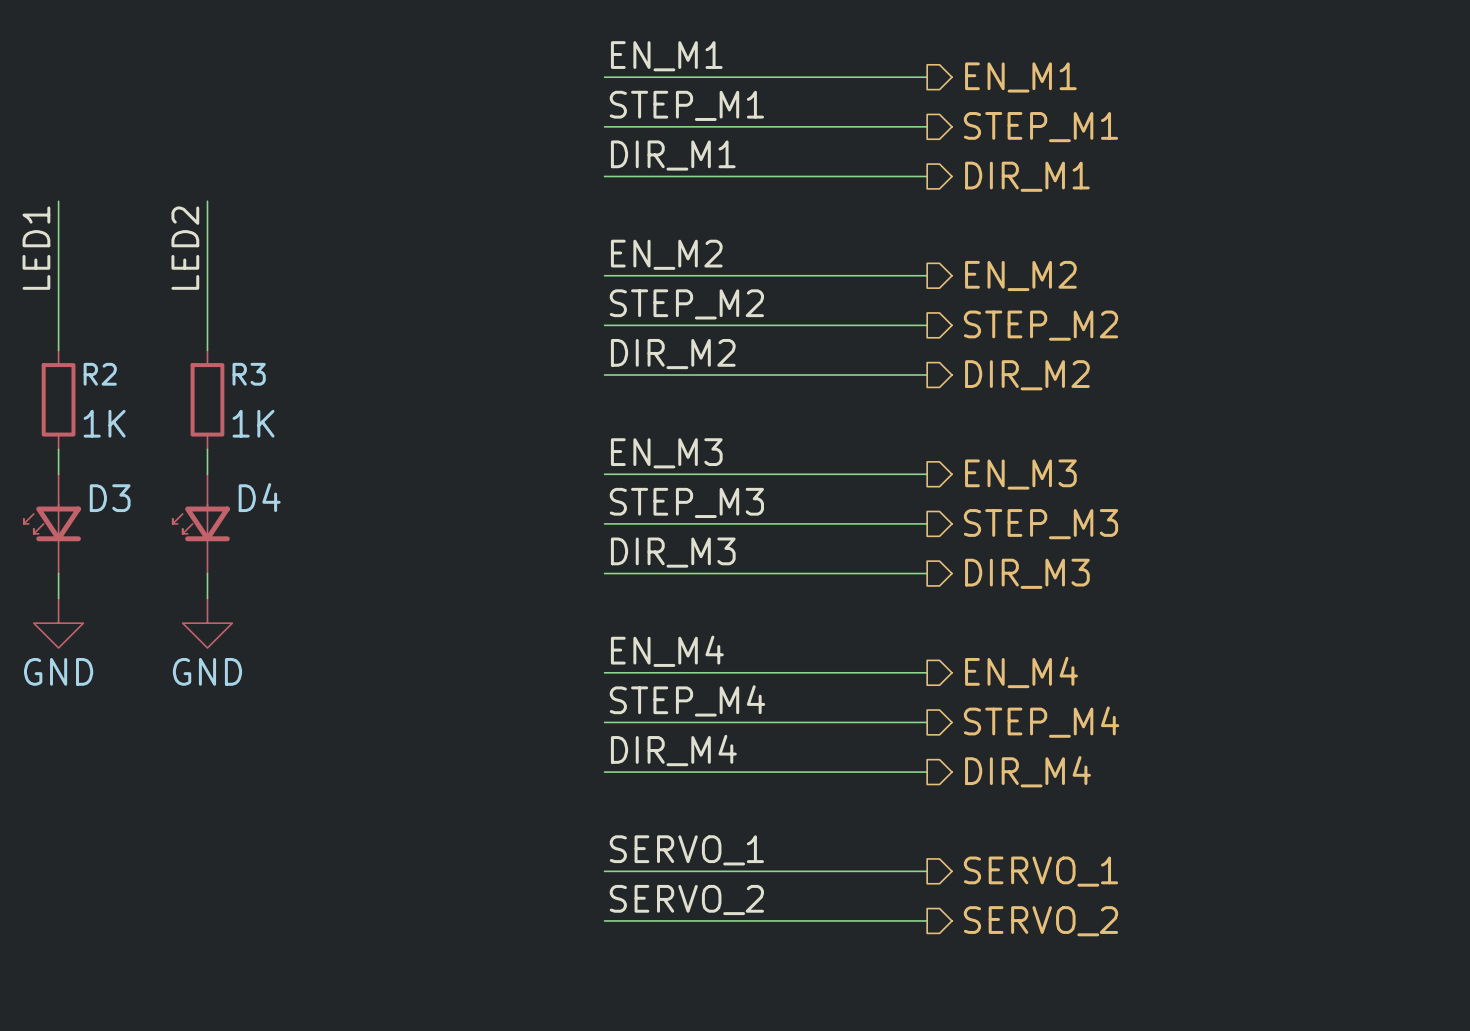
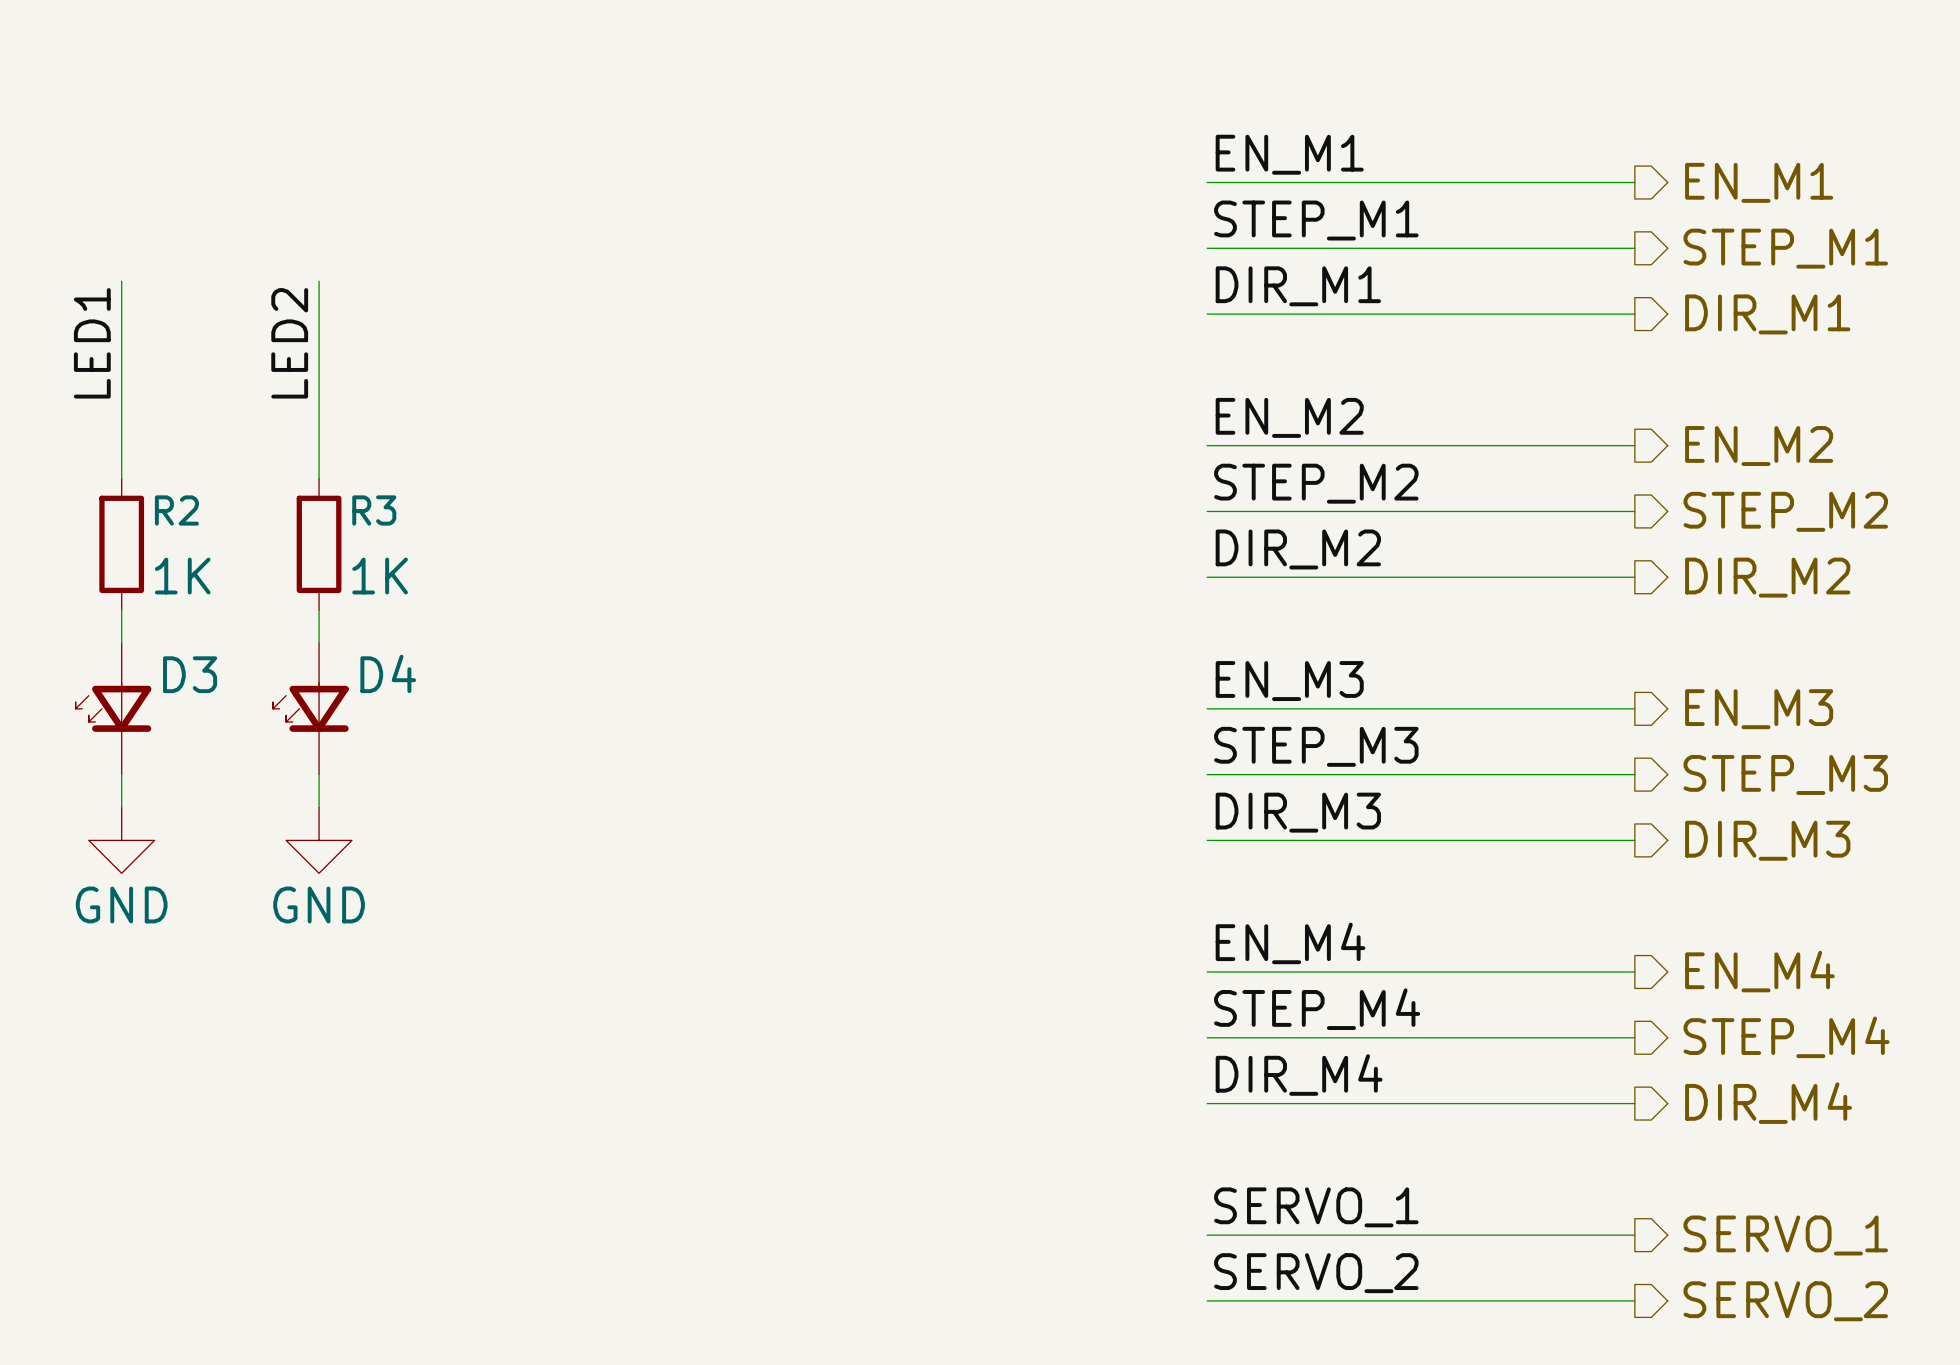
label position: EN_M1 (666, 56) -> EN_M1 (1289, 154)
wire: (604, 77) (927, 77) -> none
hierarchical label position: EN_M1 (1020, 77) -> EN_M1 (1759, 182)
label position: STEP_M1 (686, 105) -> STEP_M1 (1316, 220)
wire: (604, 126) (877, 126) -> (1273, 182) (1634, 182)
hierarchical label position: STEP_M1 (1041, 127) -> STEP_M1 (1785, 248)
label position: DIR_M1 (673, 155) -> DIR_M1 (1298, 286)
wire: (604, 176) (877, 176) -> (1273, 248) (1634, 248)
hierarchical label position: DIR_M1 (1027, 176) -> DIR_M1 (1767, 314)
label position: EN_M2 (666, 254) -> EN_M2 (1289, 417)
wire: (604, 275) (927, 275) -> (1207, 314) (1634, 314)
hierarchical label position: EN_M2 (1020, 275) -> EN_M2 (1759, 446)
label position: STEP_M2 (686, 304) -> STEP_M2 (1316, 483)
wire: (604, 325) (877, 325) -> (1273, 445) (1634, 445)
hierarchical label position: STEP_M2 (1041, 325) -> STEP_M2 (1785, 511)
label position: DIR_M2 (673, 354) -> DIR_M2 (1298, 549)
wire: (604, 375) (877, 375) -> (1273, 511) (1634, 511)
hierarchical label position: DIR_M2 (1027, 375) -> DIR_M2 (1767, 577)
label position: EN_M3 (666, 453) -> EN_M3 (1289, 681)
wire: (604, 474) (927, 474) -> (1207, 577) (1634, 577)
hierarchical label position: EN_M3 (1020, 474) -> EN_M3 (1759, 709)
label position: STEP_M3 (686, 502) -> STEP_M3 (1316, 746)
wire: (604, 523) (877, 523) -> (1273, 708) (1634, 708)
hierarchical label position: STEP_M3 (1041, 524) -> STEP_M3 (1785, 774)
label position: DIR_M3 (673, 552) -> DIR_M3 (1298, 812)
wire: (604, 573) (877, 573) -> (1273, 774) (1634, 774)
hierarchical label position: DIR_M3 (1027, 573) -> DIR_M3 (1767, 840)
label position: EN_M4 (667, 651) -> EN_M4 (1290, 943)
wire: (604, 672) (927, 672) -> (1207, 840) (1634, 840)
hierarchical label position: EN_M4 (1021, 672) -> EN_M4 (1759, 971)
label position: STEP_M4 (687, 700) -> STEP_M4 (1317, 1009)
wire: (604, 722) (877, 722) -> (1273, 972) (1634, 972)
hierarchical label position: STEP_M4 (1041, 722) -> STEP_M4 (1786, 1037)
label position: DIR_M4 (673, 750) -> DIR_M4 (1299, 1075)
hierarchical label position: DIR_M4 (1028, 771) -> DIR_M4 (1768, 1103)
wire: (604, 772) (877, 772) -> (1273, 1037) (1634, 1037)
label position: SERVO_1 (686, 850) -> SERVO_1 (1316, 1207)
wire: (604, 871) (927, 871) -> (1207, 1103) (1634, 1103)
hierarchical label position: SERVO_1 (1041, 871) -> SERVO_1 (1785, 1235)
label position: SERVO_2 (686, 900) -> SERVO_2 (1316, 1273)
wire: (604, 920) (877, 920) -> (1273, 1235) (1634, 1235)
hierarchical label position: SERVO_2 (1041, 921) -> SERVO_2 (1785, 1301)
wire: none -> (1207, 1300) (1634, 1300)

